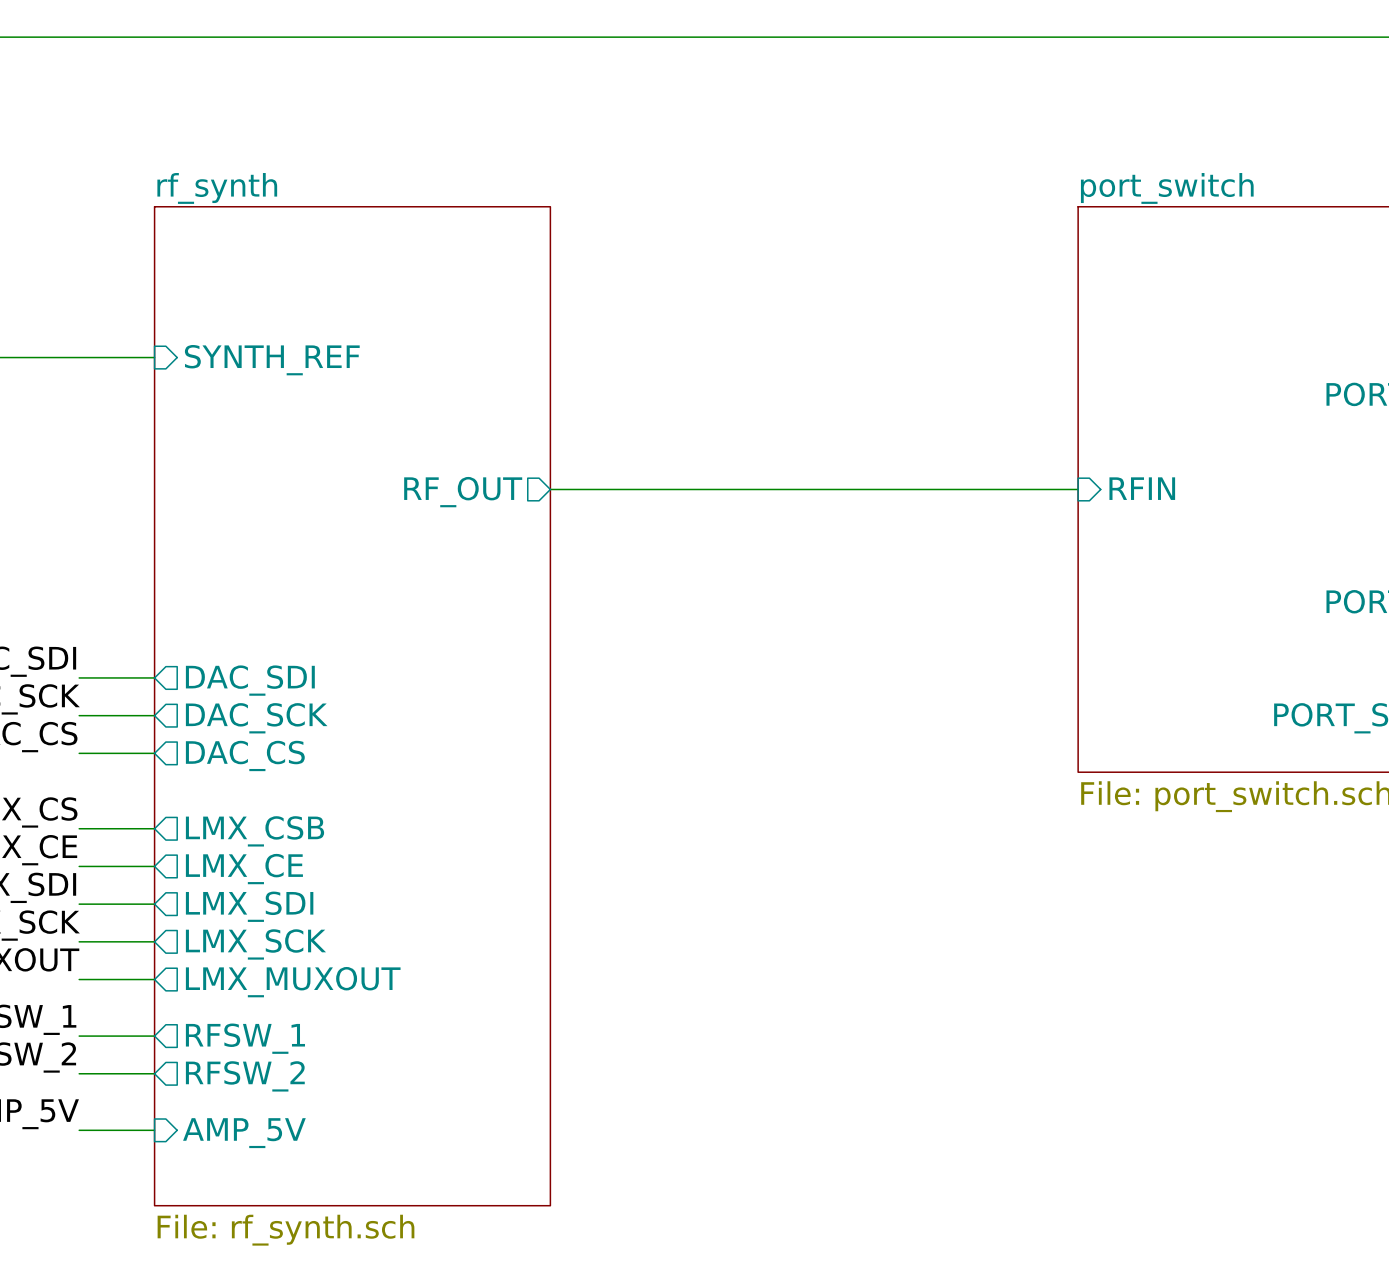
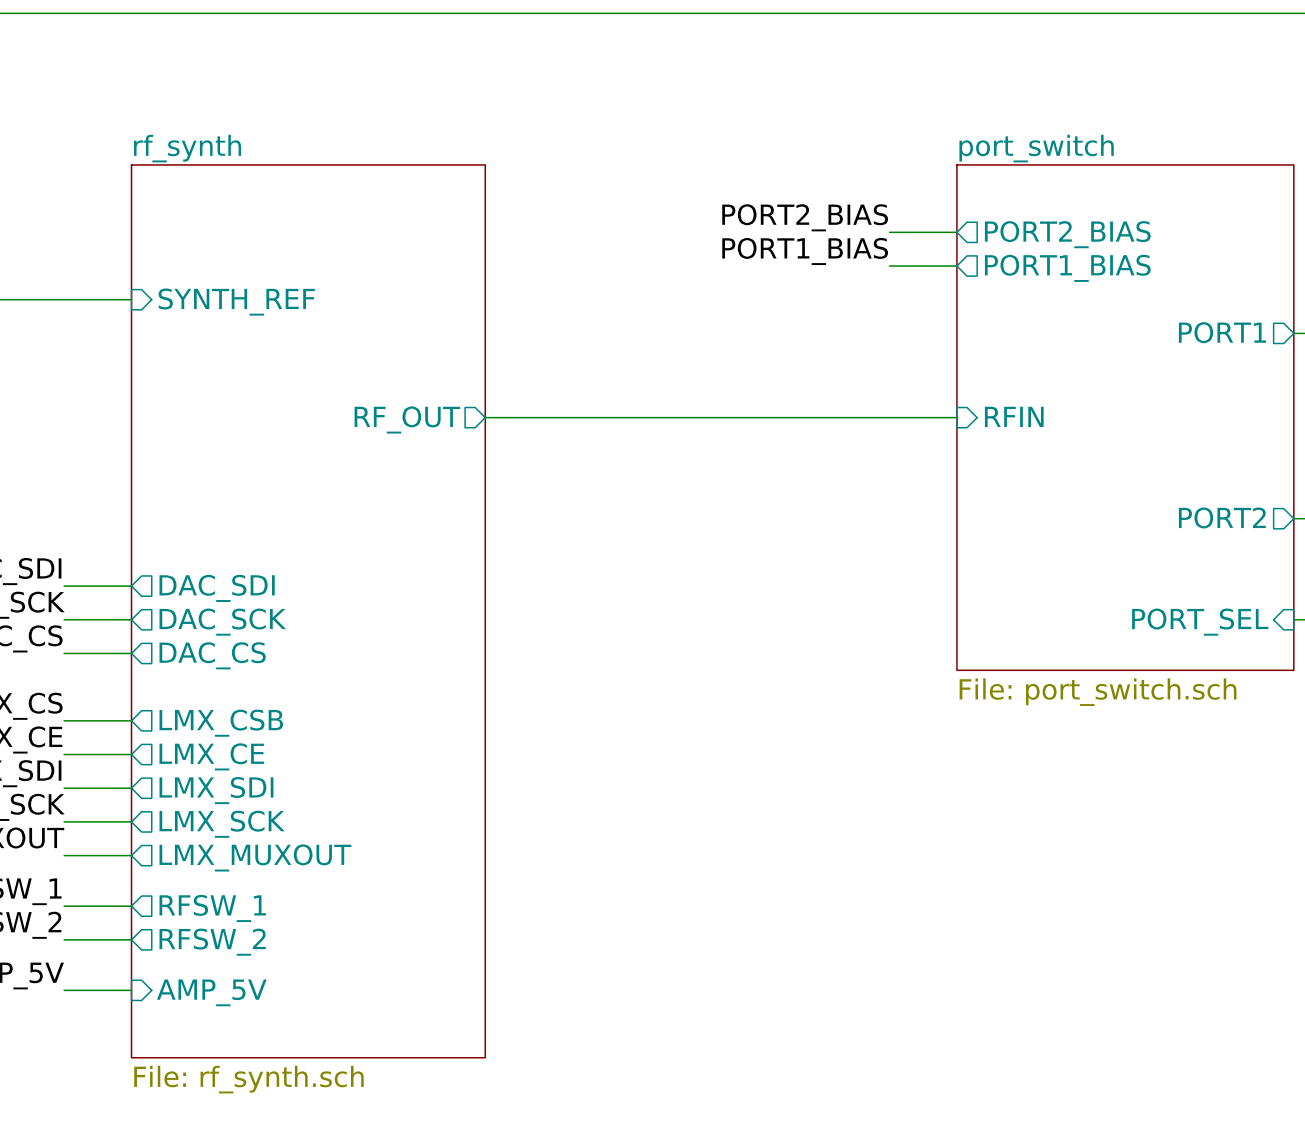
label: none -> PORT2_BIAS (805, 217)
wire: none -> (889, 232) (956, 232)
sheet pin: none -> PORT2_BIAS (1067, 234)
label: none -> PORT1_BIAS (805, 251)
wire: none -> (889, 266) (956, 266)
sheet pin: none -> PORT1_BIAS (1067, 268)

